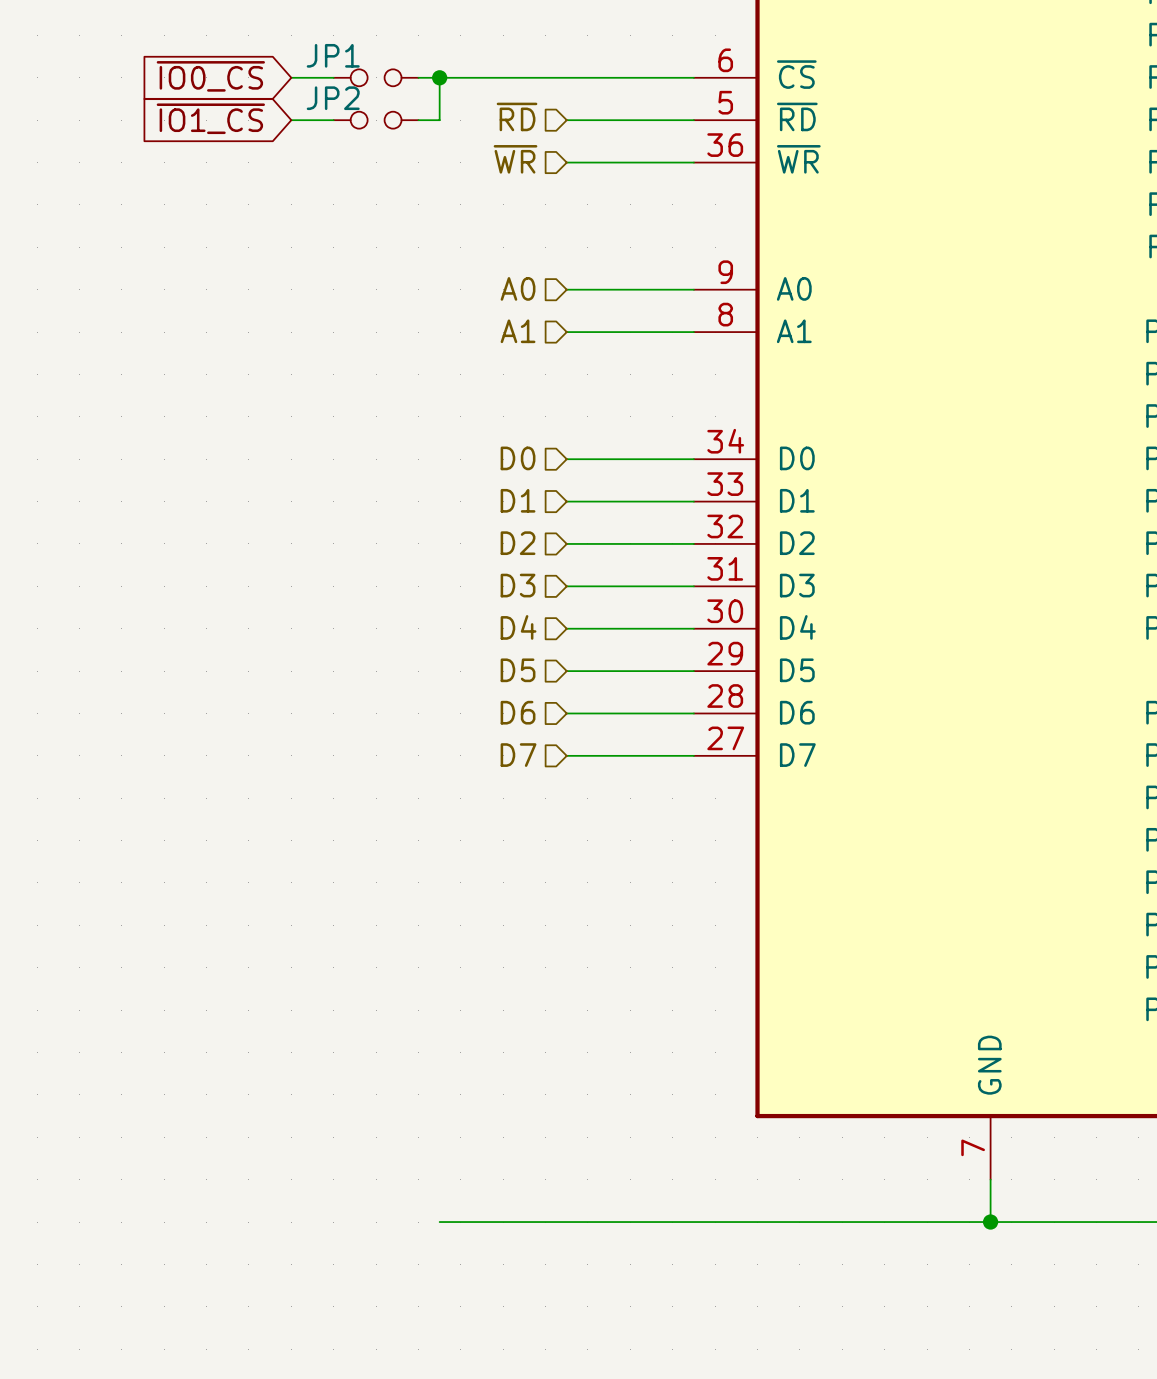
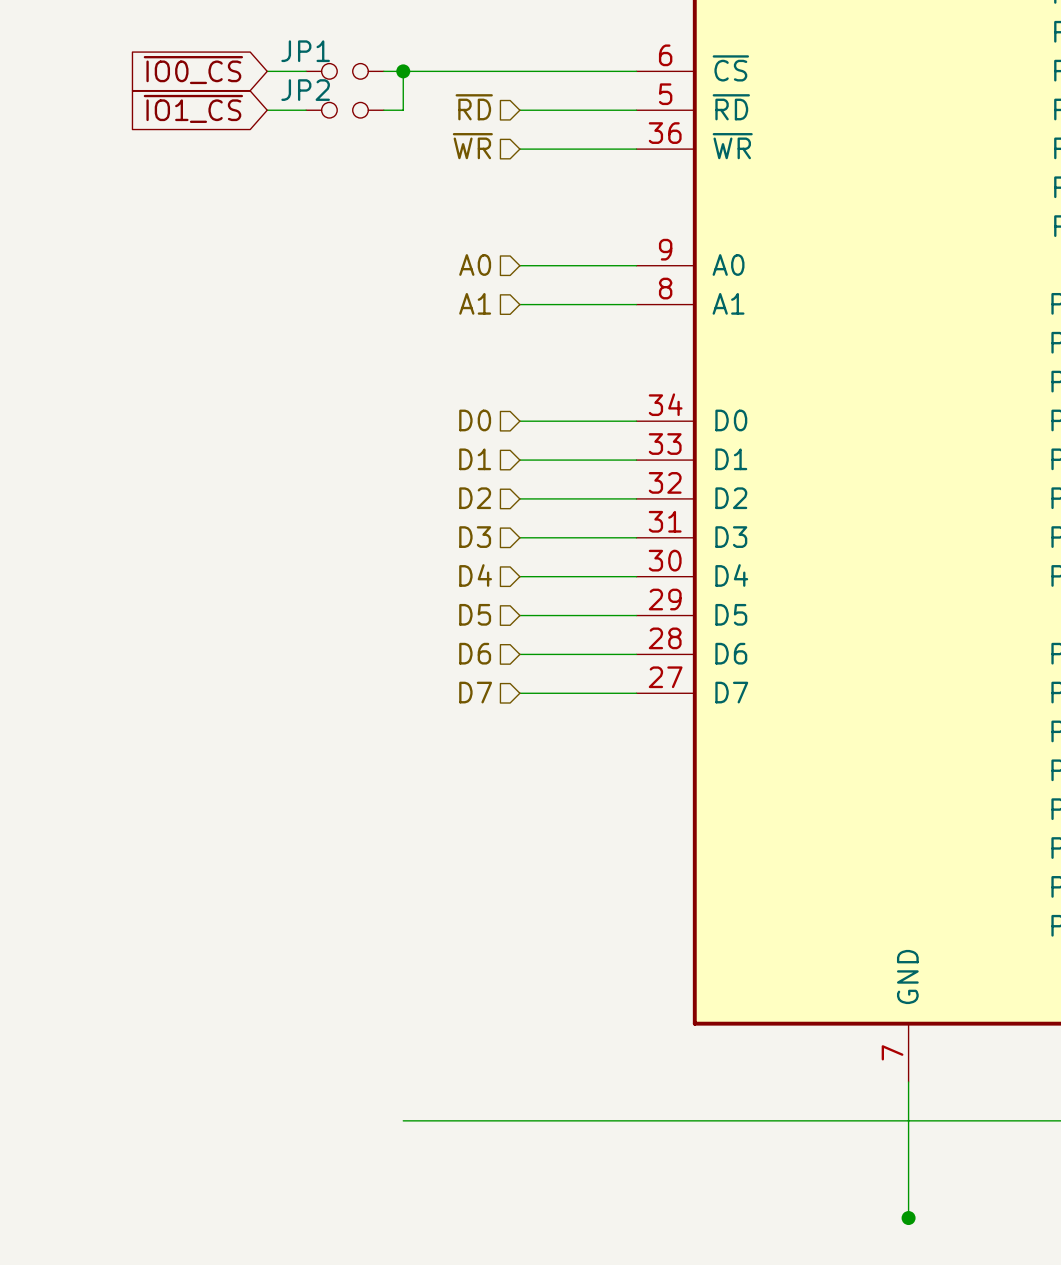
wire: none -> (908, 1120) (908, 1218)
junction: (990, 1222) -> none
junction: none -> (908, 1218)

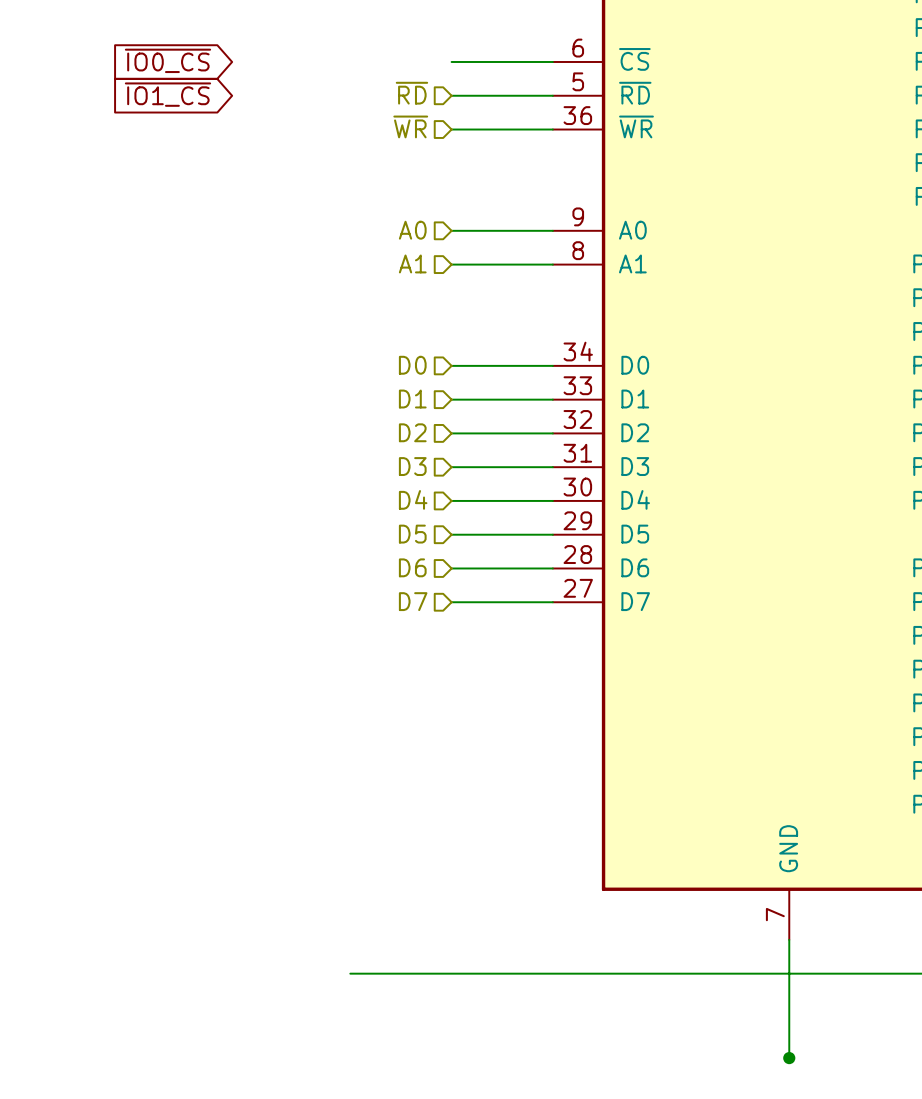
wire: (267, 71) (306, 71) -> none
JP1: (344, 71) -> none
wire: (383, 71) (519, 71) -> none
wire: (403, 71) (403, 110) (383, 110) -> none
junction: (403, 71) -> none
wire: (267, 110) (306, 110) -> none
JP2: (344, 110) -> none

